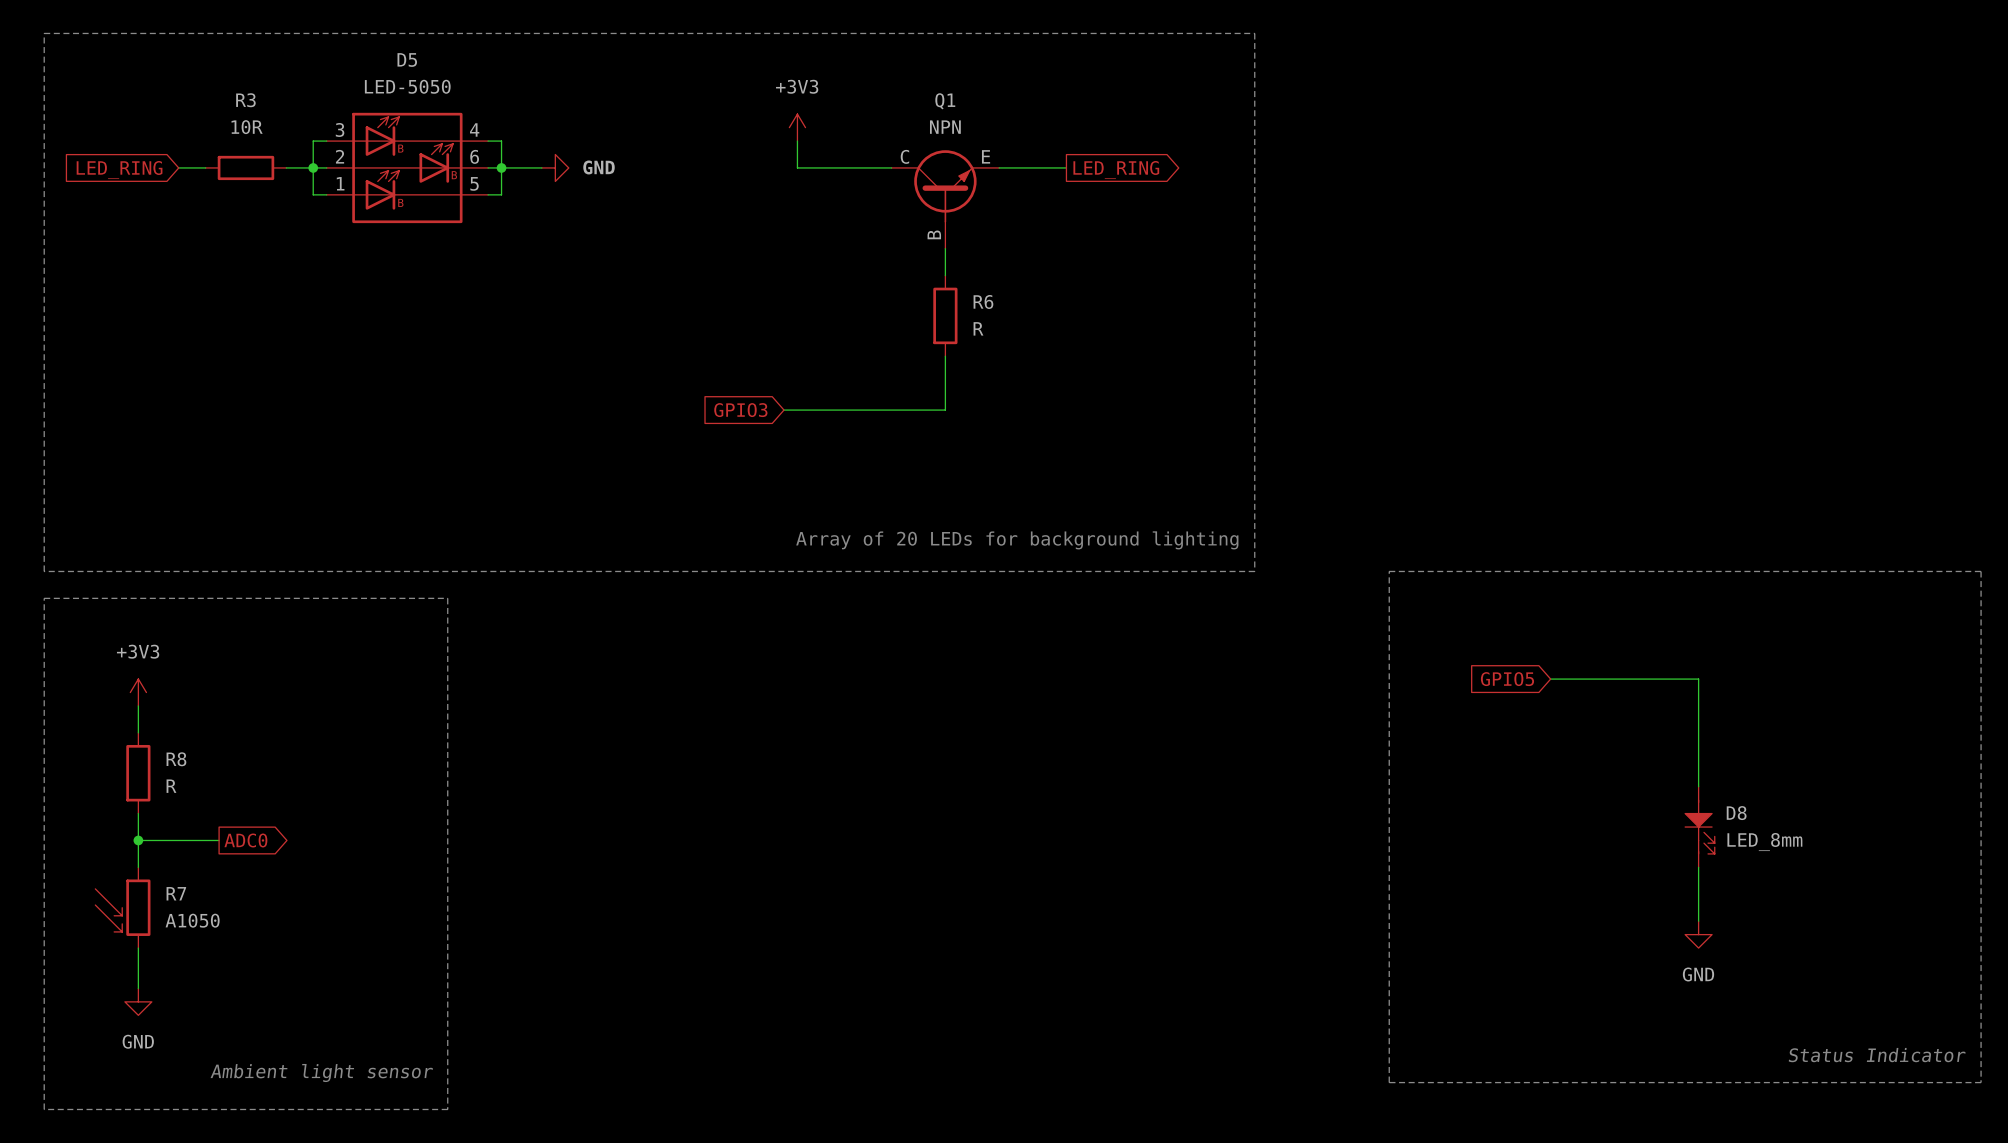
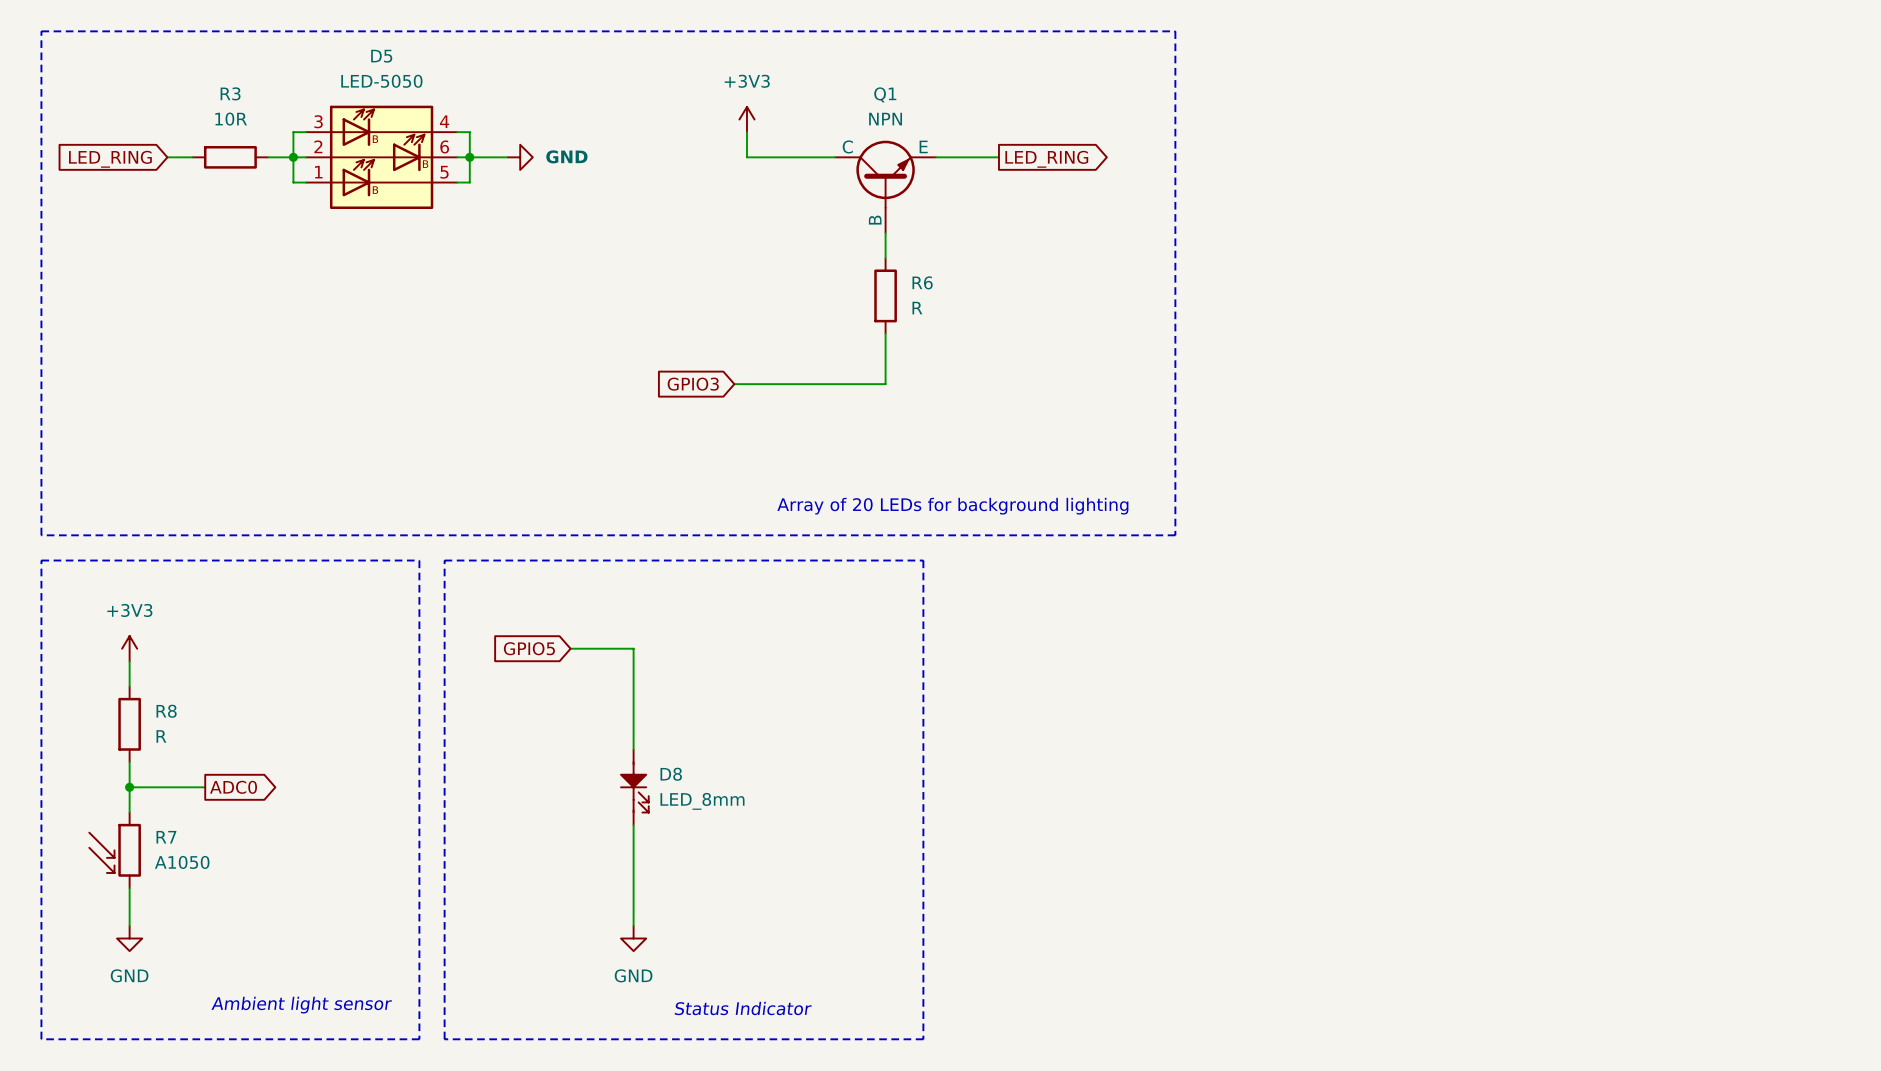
line: (1389, 571) (1981, 571) (1981, 1082) (1389, 1082) (1389, 571) -> none
line: none -> (444, 560) (923, 560) (923, 1039) (444, 1039) (444, 560)
global label: GPIO5 (1507, 679) -> none
wire: (1550, 679) (1698, 679) (1698, 786) -> none
global label: none -> GPIO5 (529, 648)
wire: none -> (570, 648) (633, 648) (633, 749)
D8 position: (1699, 827) -> (634, 787)
wire: (1698, 867) (1698, 921) -> none
wire: none -> (633, 825) (633, 925)
power symbol: GND (1698, 934) -> none
power symbol: none -> GND (633, 938)
text: Status Indicator (1877, 1055) -> none
text: none -> Status Indicator (743, 1008)

